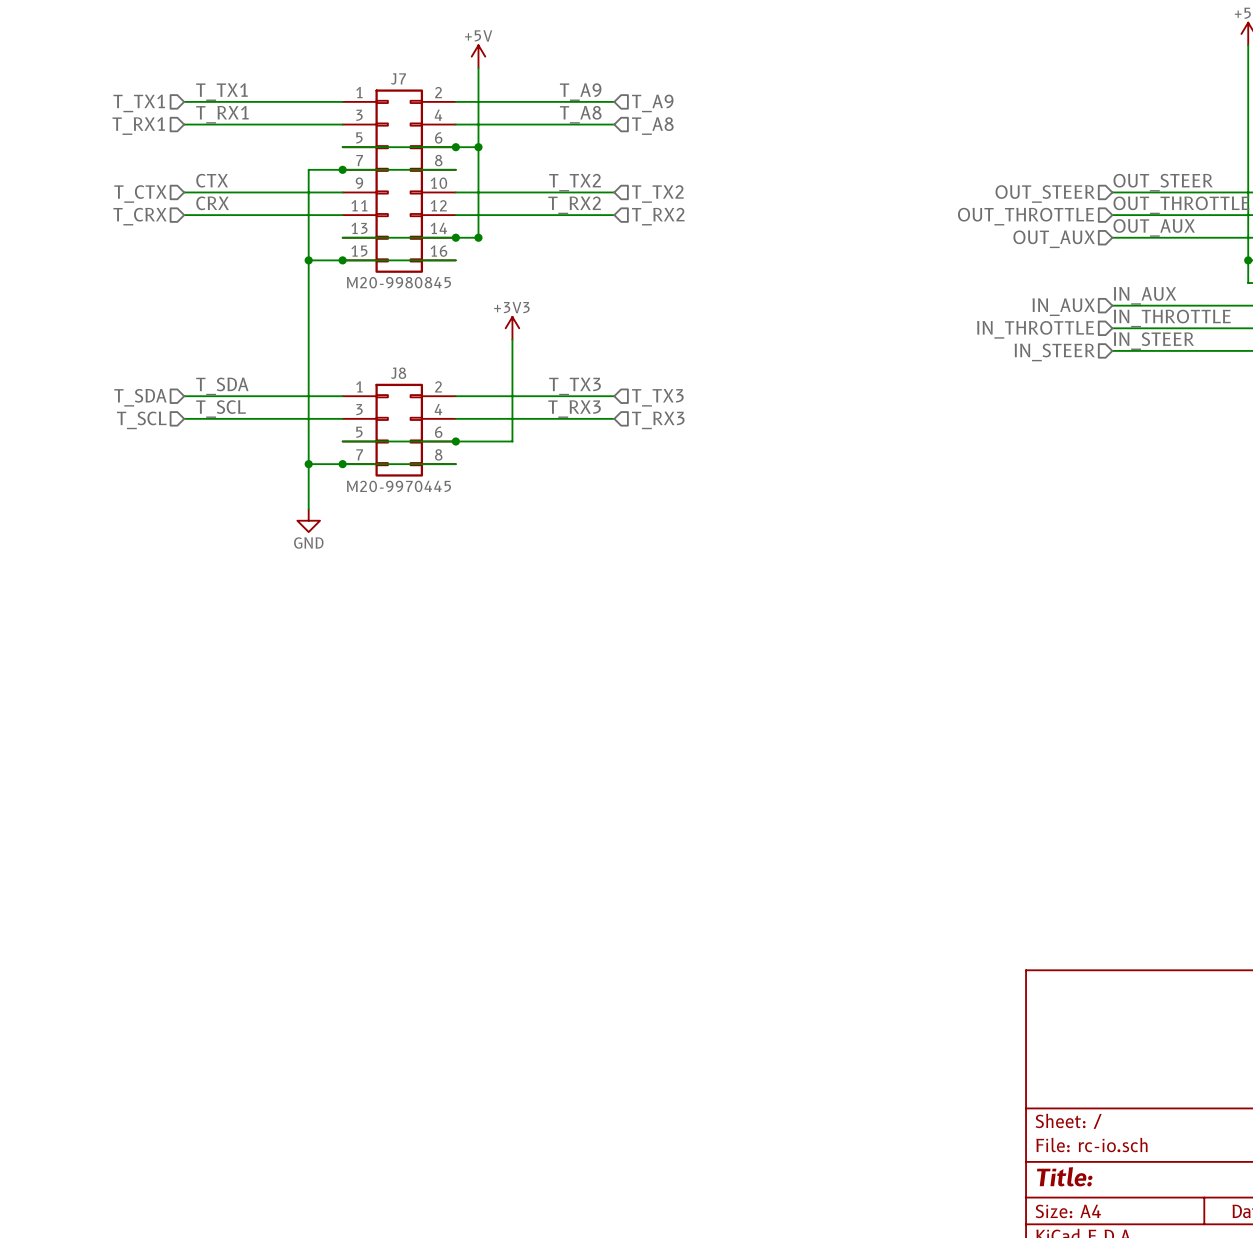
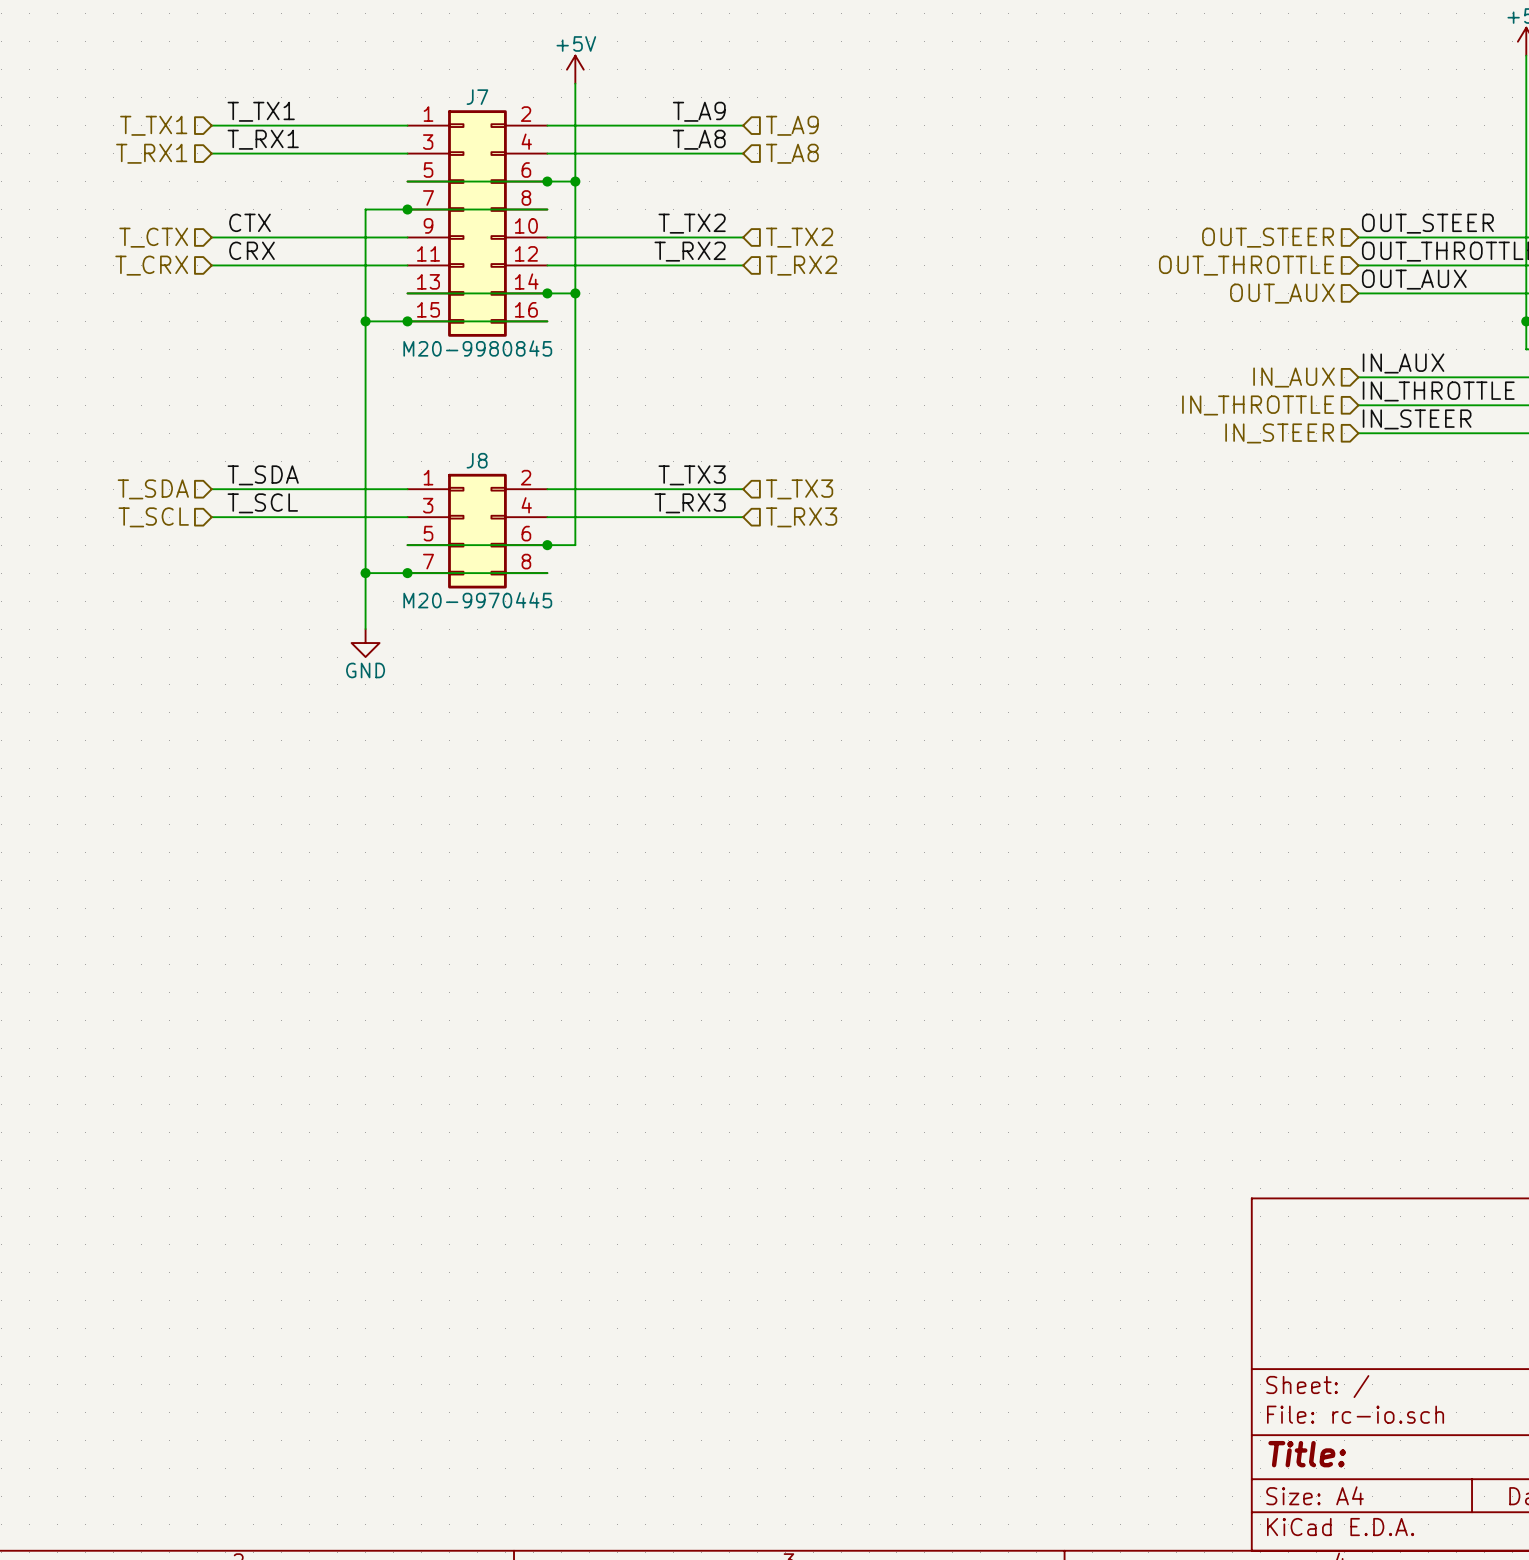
power symbol: +3V3 (512, 328) -> none
wire: (512, 339) (512, 441) (478, 441) -> (575, 293) (575, 545)

